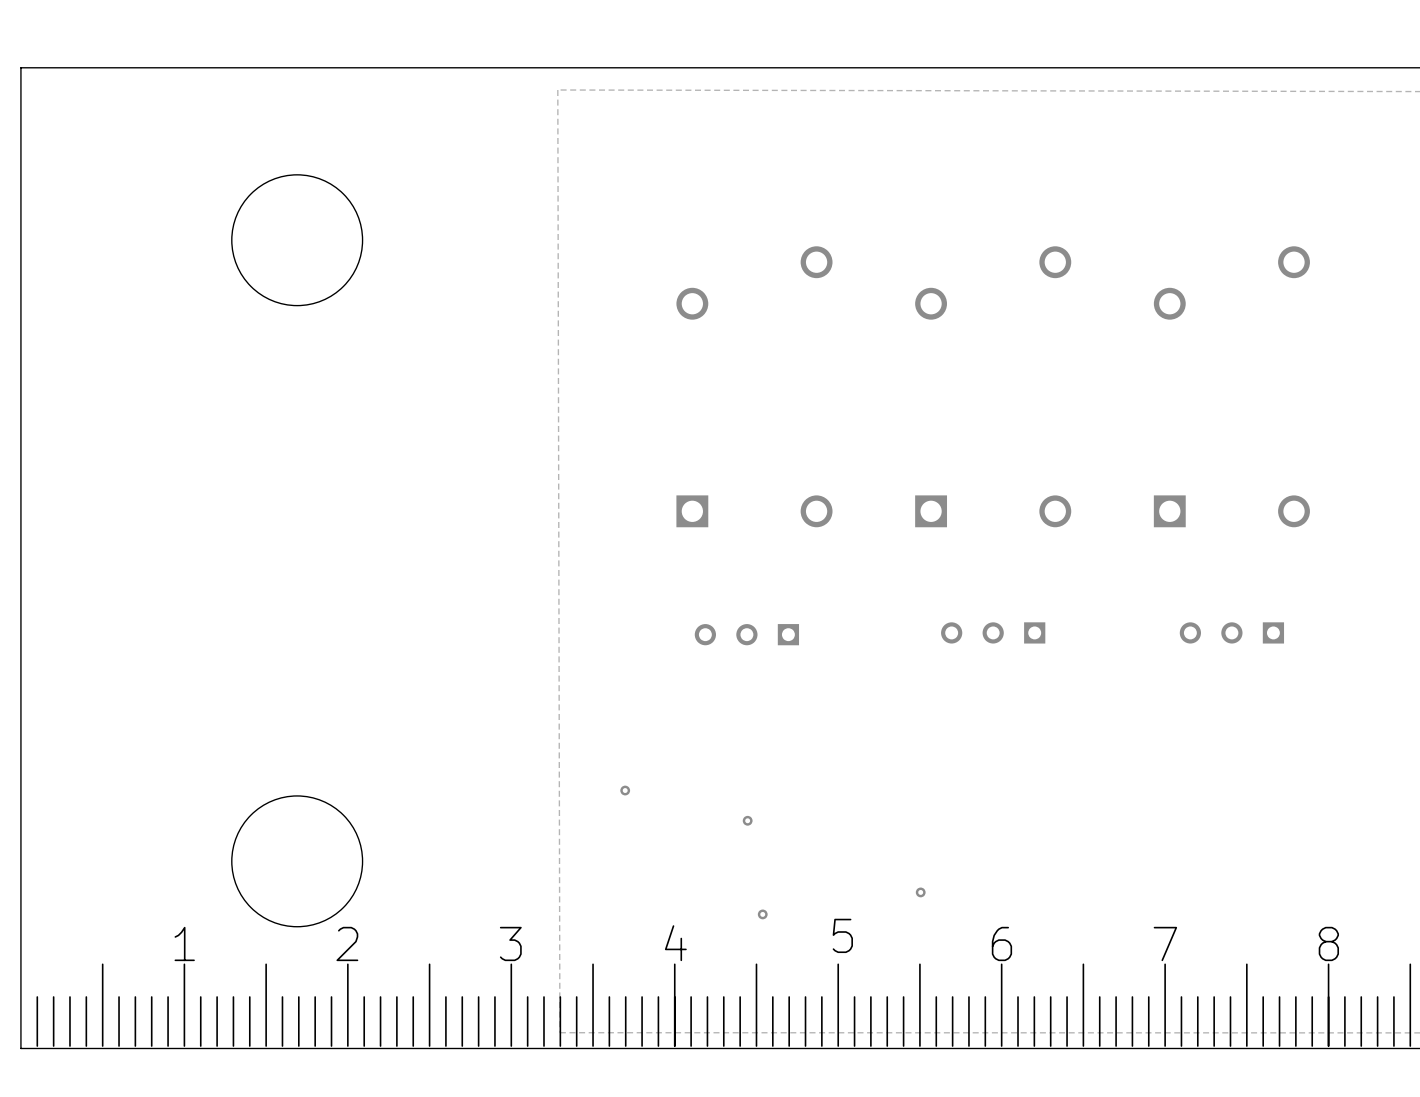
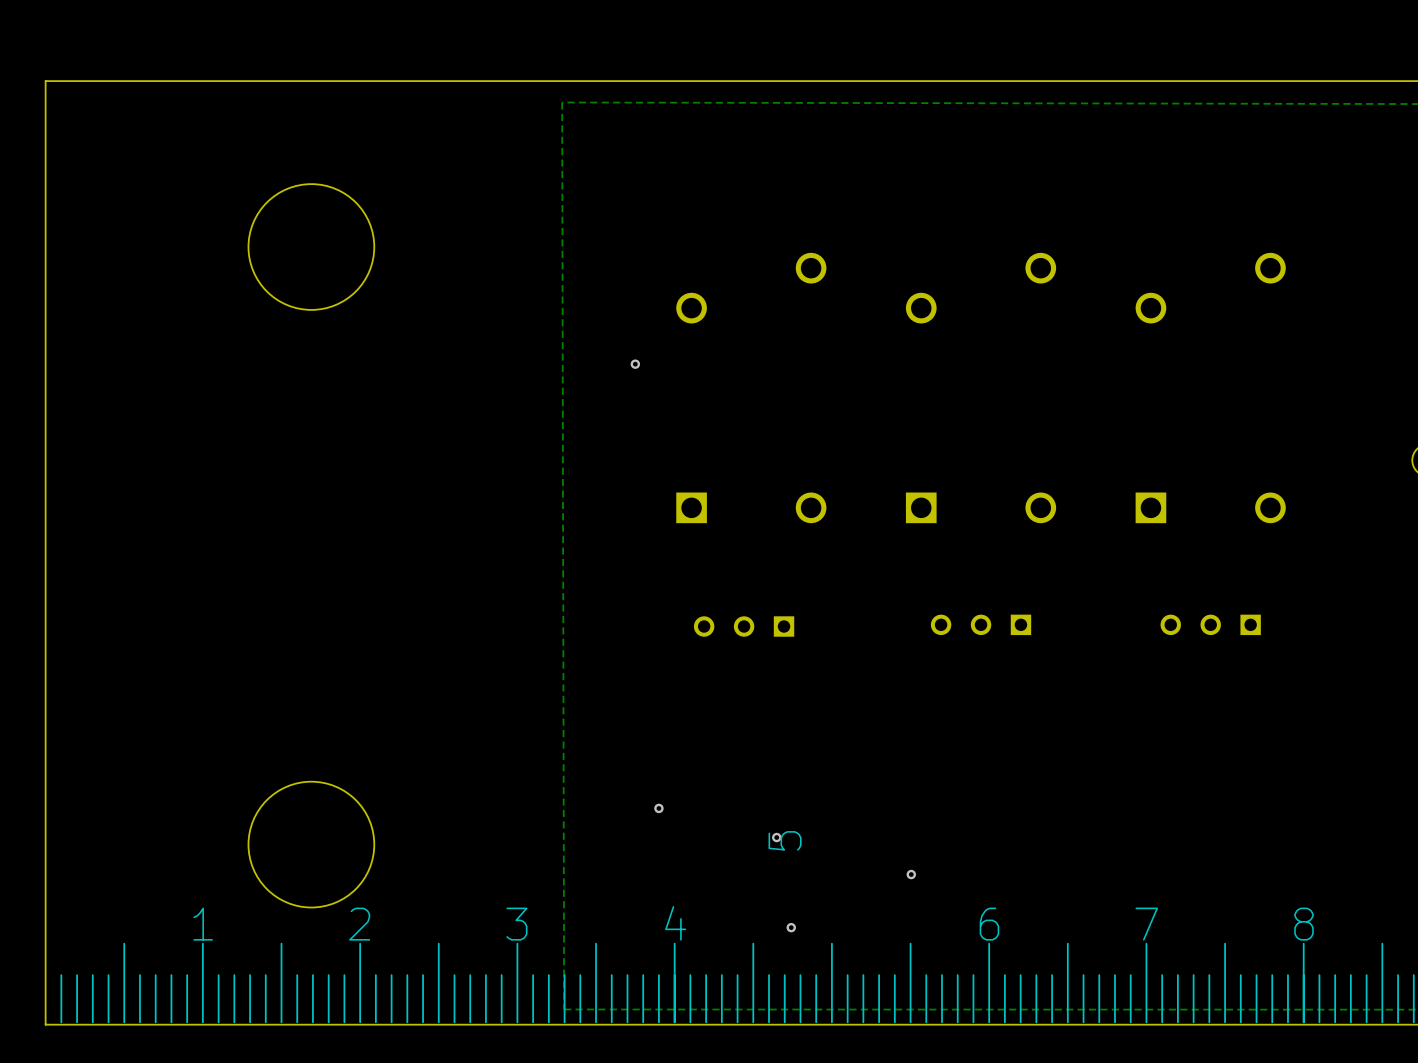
via: none -> (635, 364)
via: (625, 790) -> none
via: (747, 820) -> none
via: none -> (658, 808)
via: none -> (776, 837)
via: (762, 914) -> none
text rotation: 0° (842, 935) -> 90° counterclockwise (785, 840)
text position: 5 (842, 935) -> 5 (785, 840)
via: none -> (791, 927)

